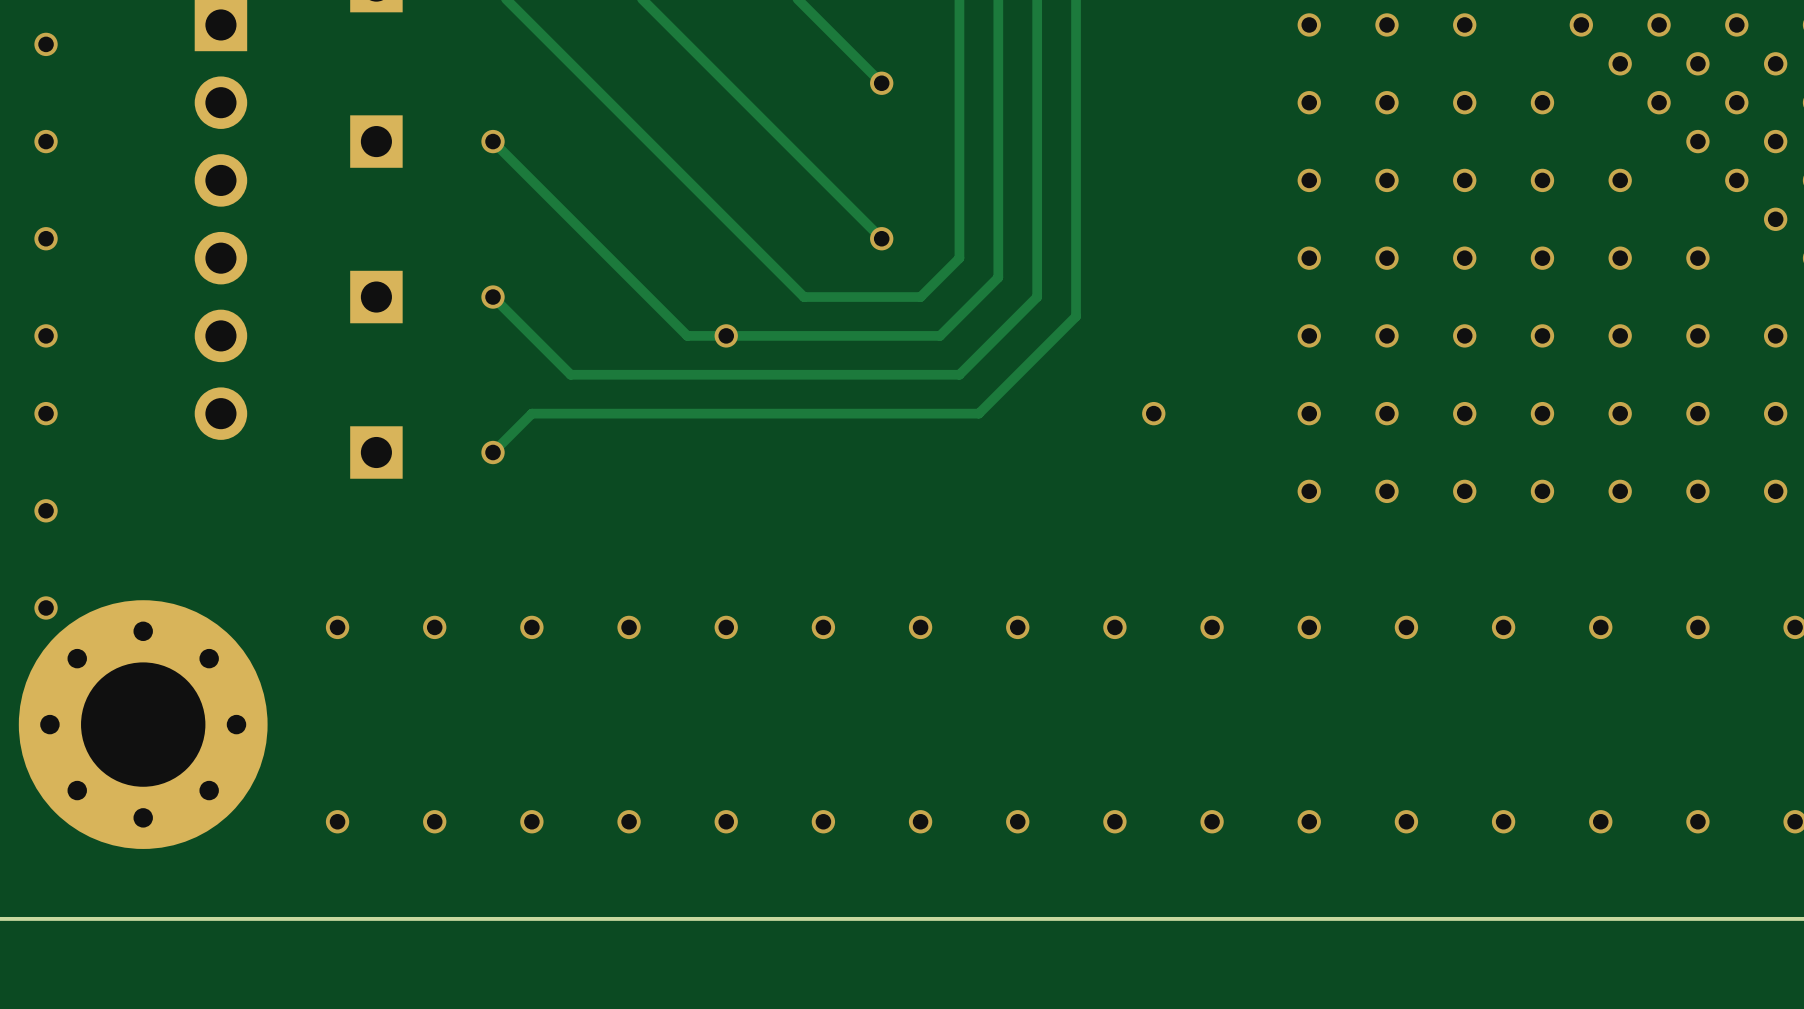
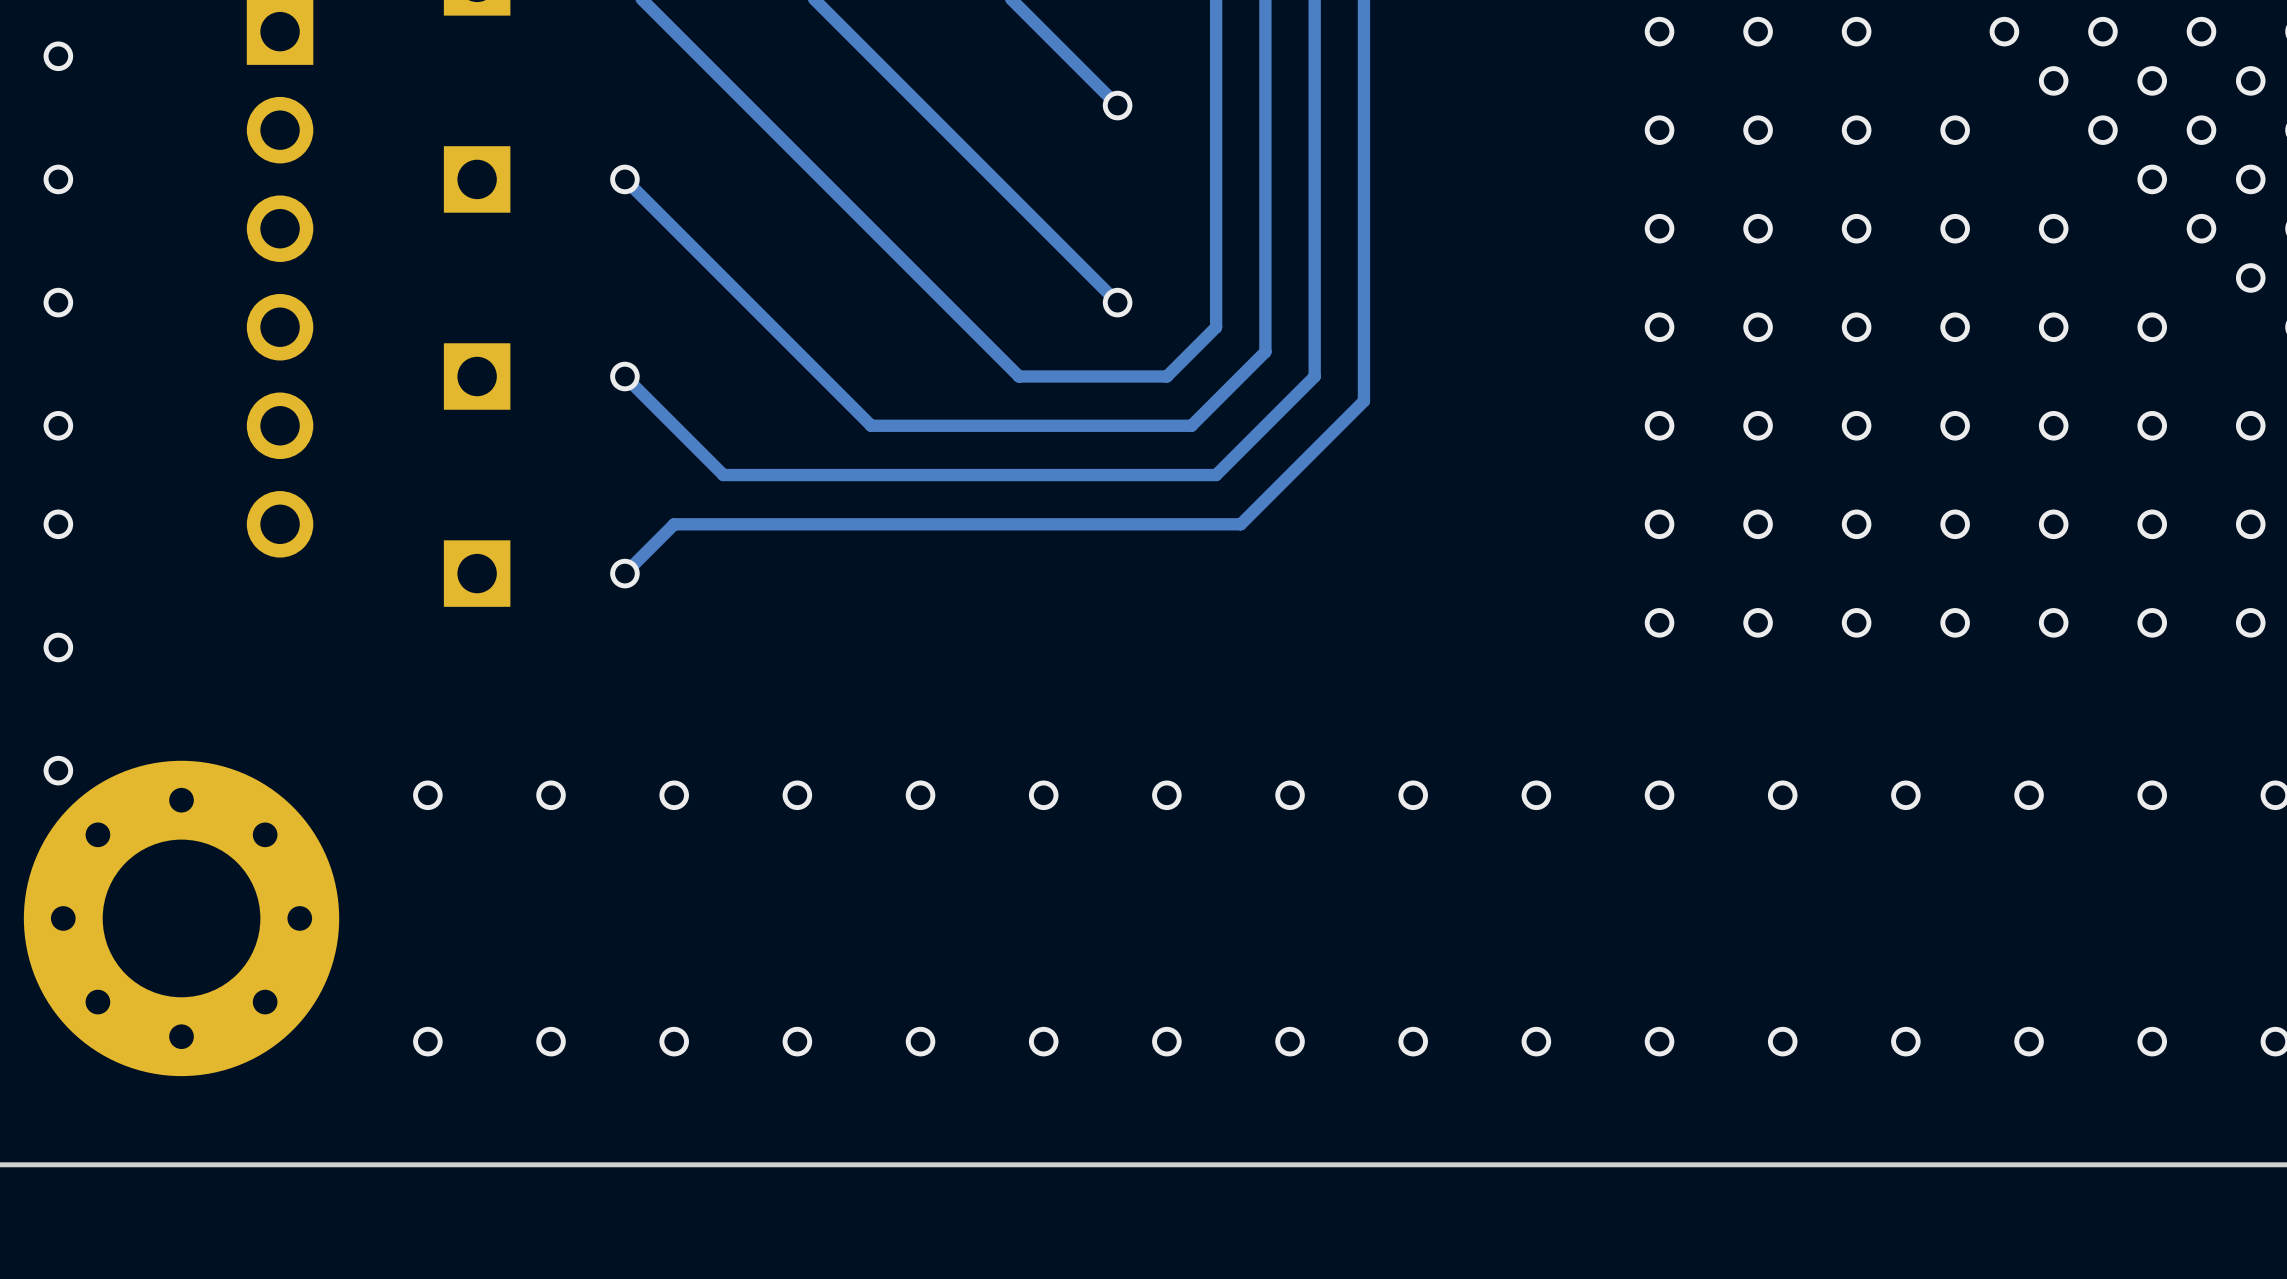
via: (726, 335) -> none
via: (1153, 413) -> none

